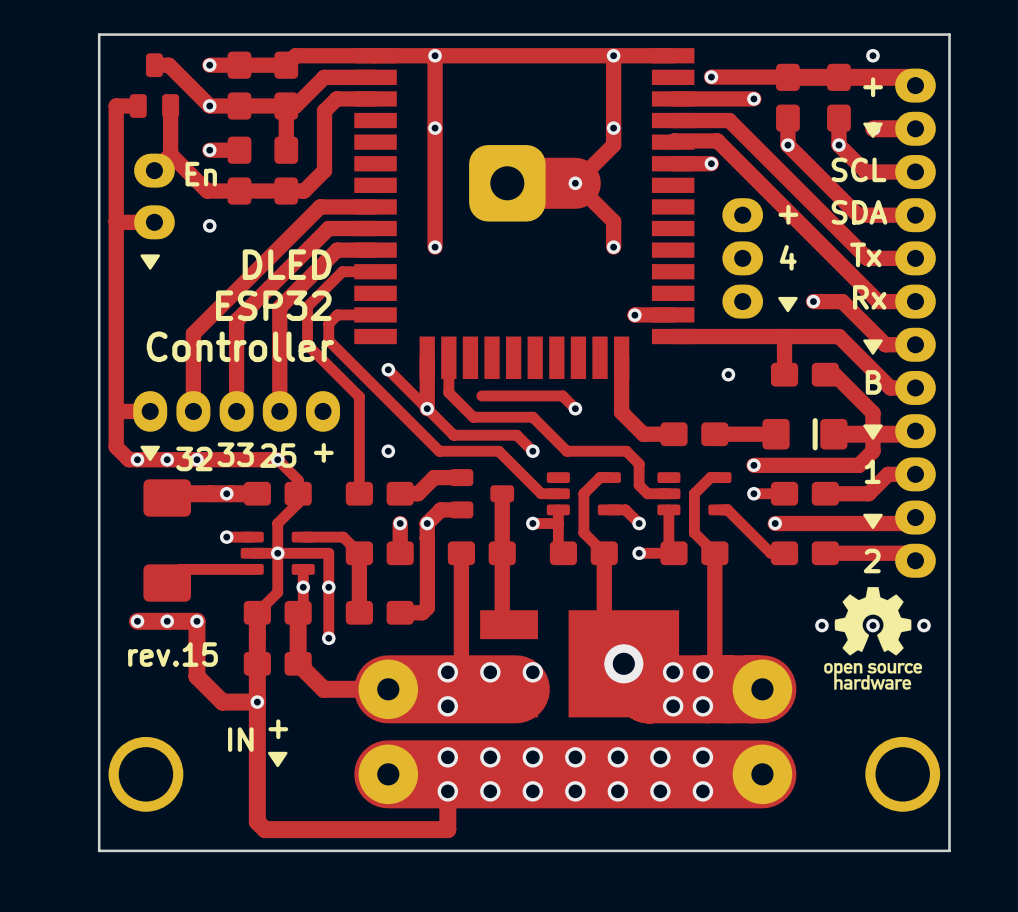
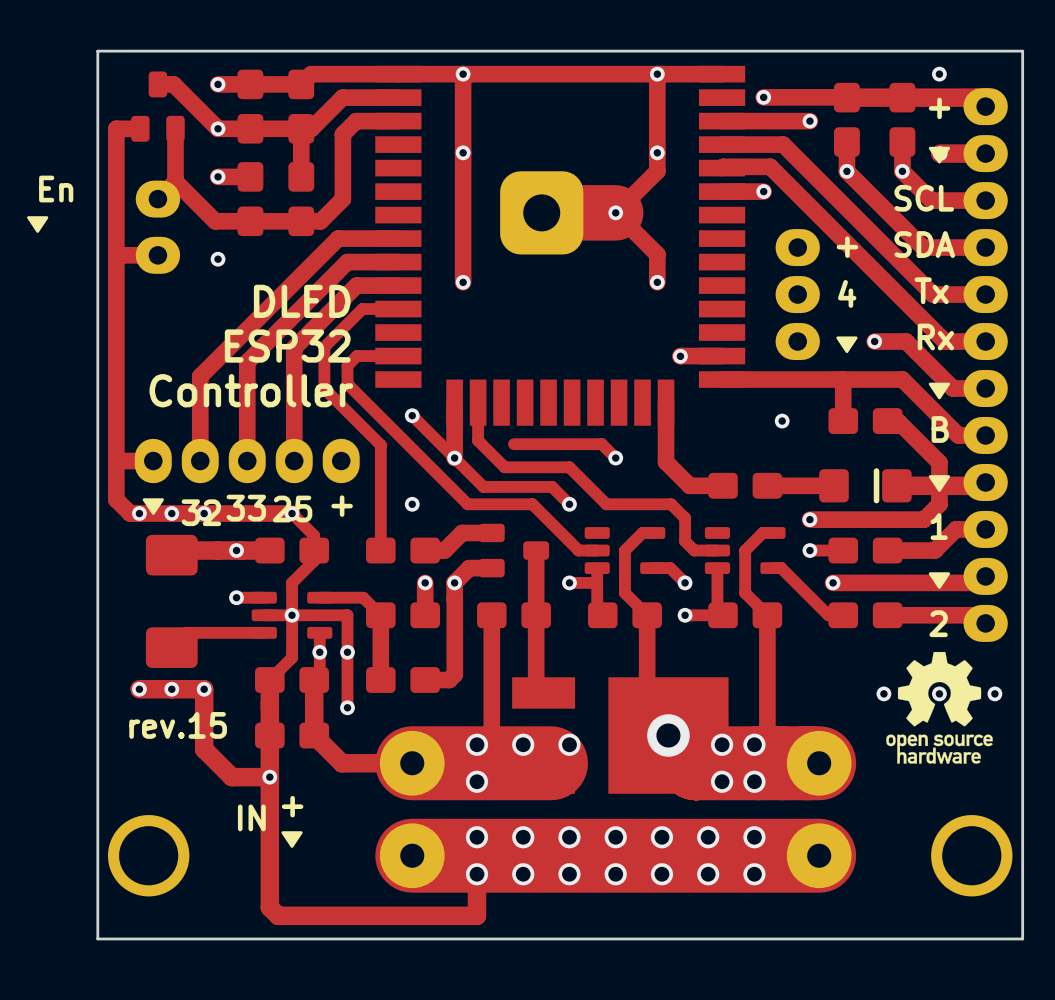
text position: En (201, 174) -> En (56, 189)
drawing position: (150, 262) -> (37, 224)

